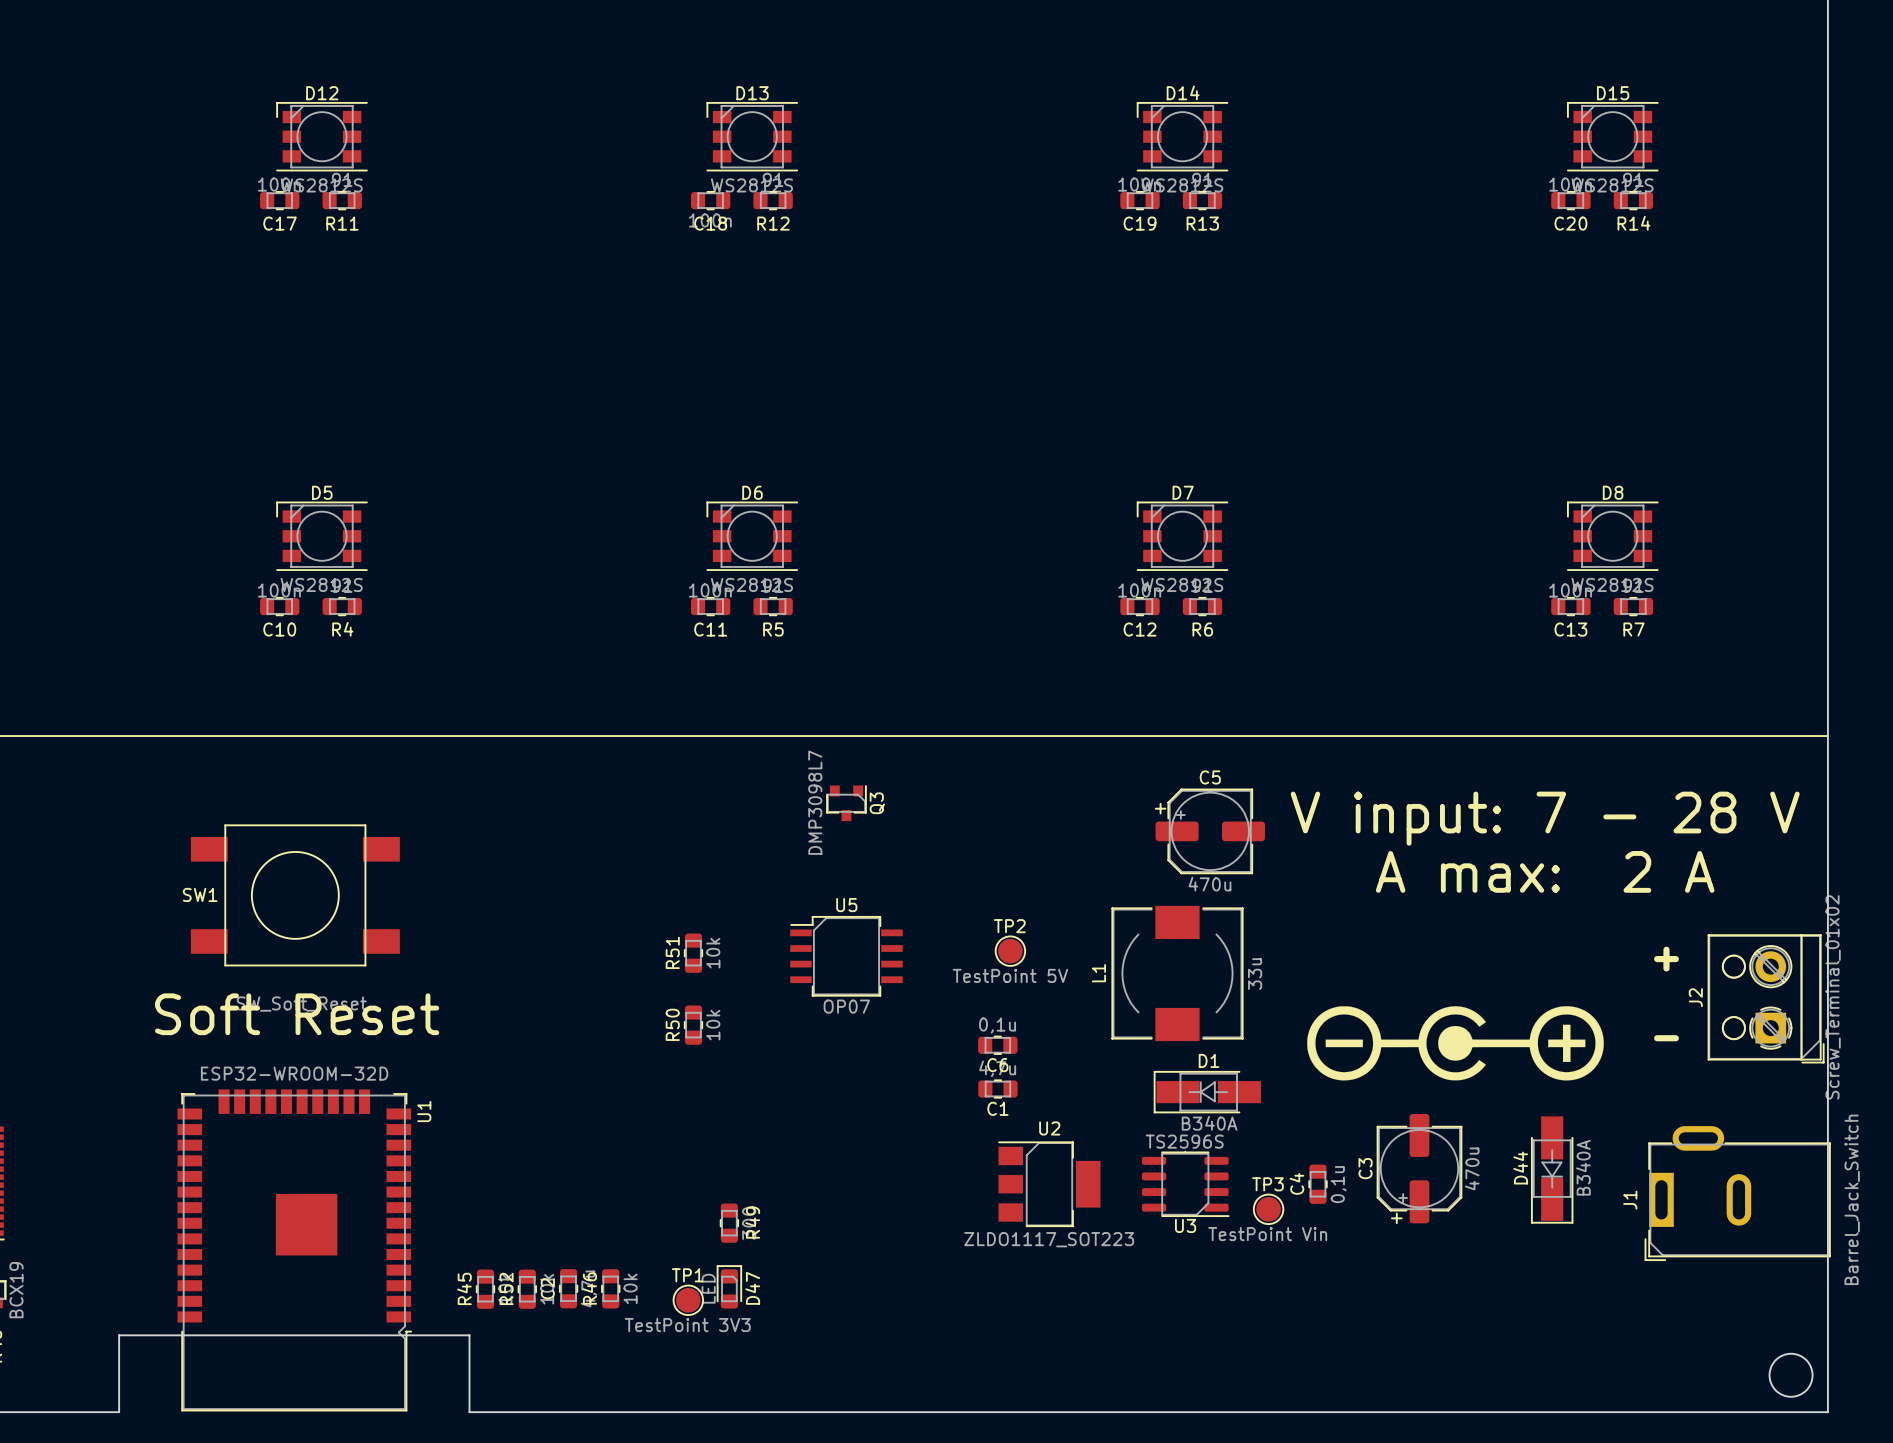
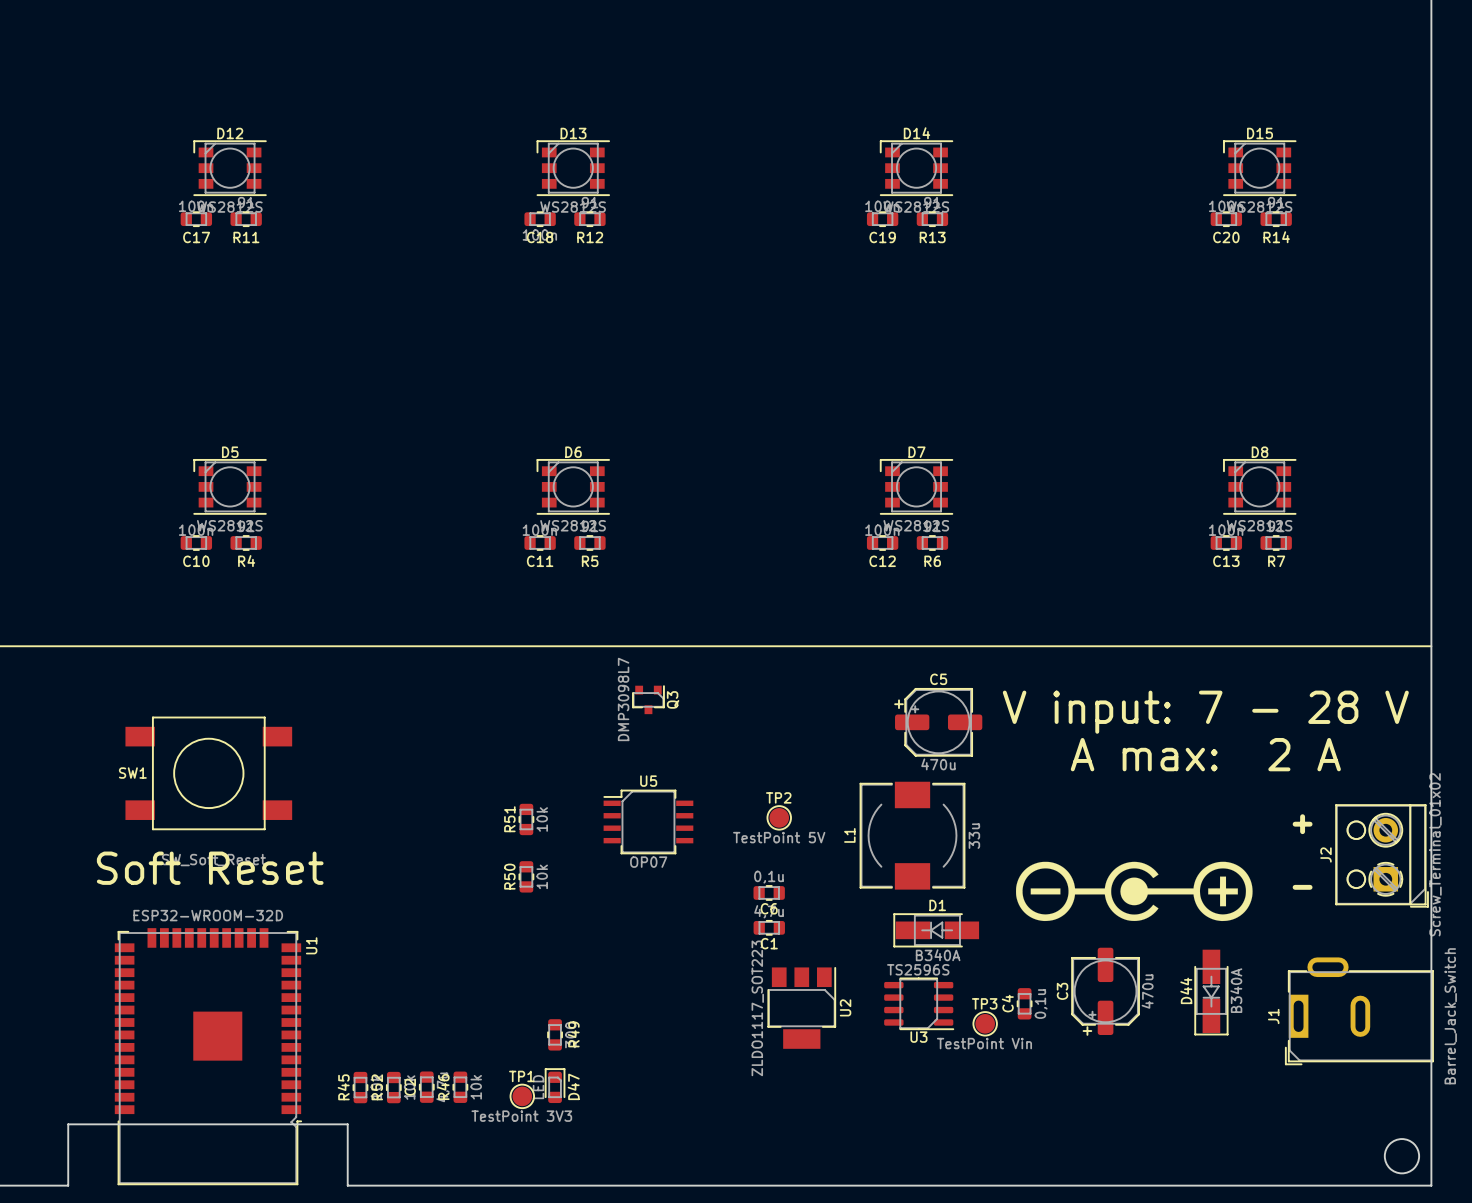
U2 rotation: 0° (1049, 1184) -> 90° clockwise (801, 1008)

